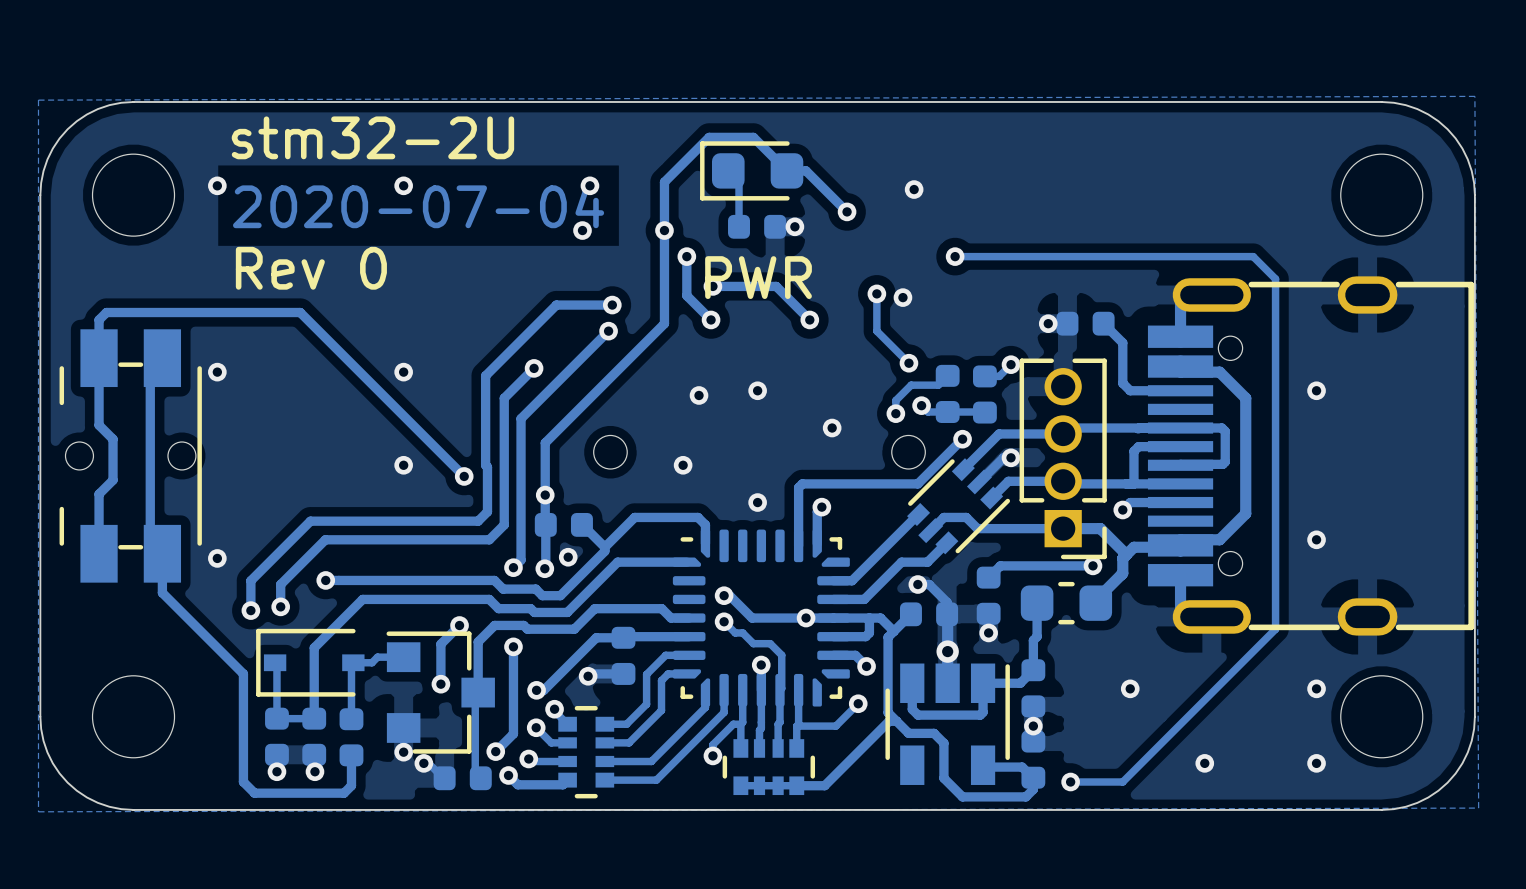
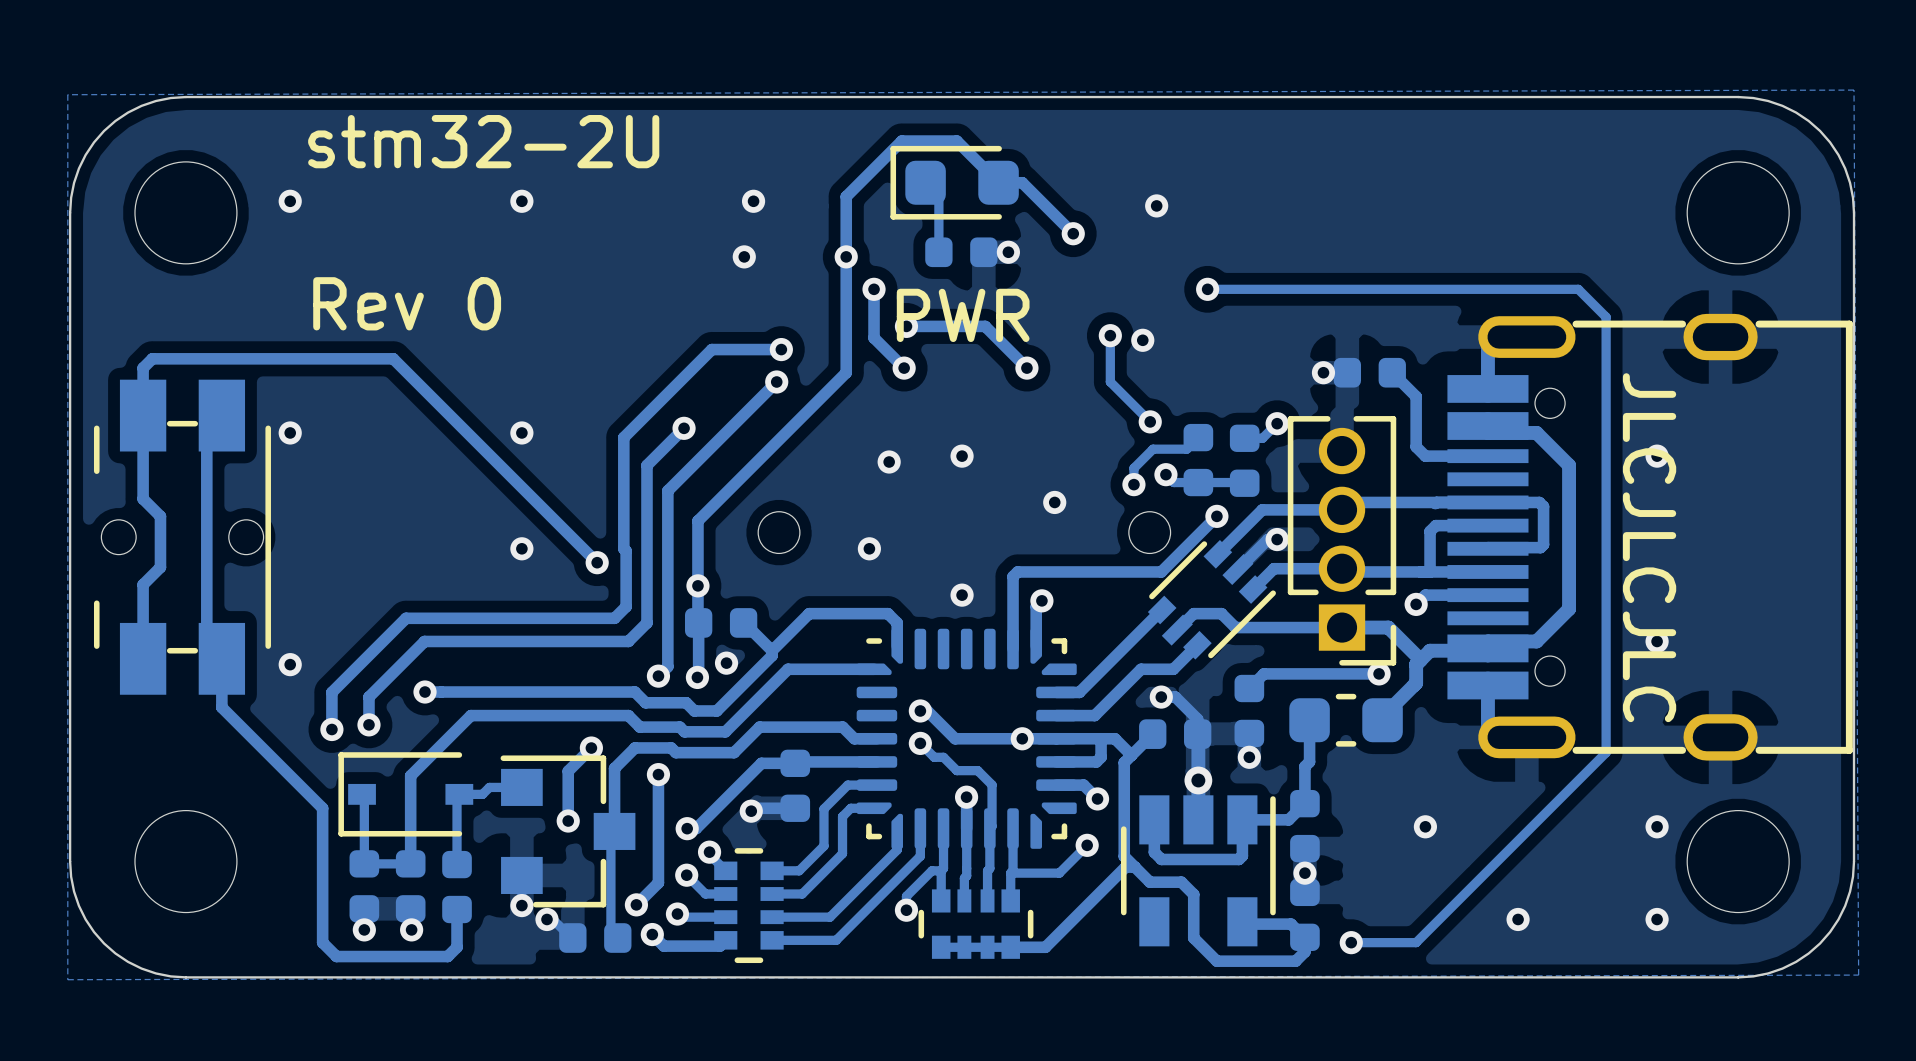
drawing: [231, 116, 605, 290] -> none
drawing: none -> [308, 115, 660, 331]
text: none -> JLCJLCJLC (1649, 547)

